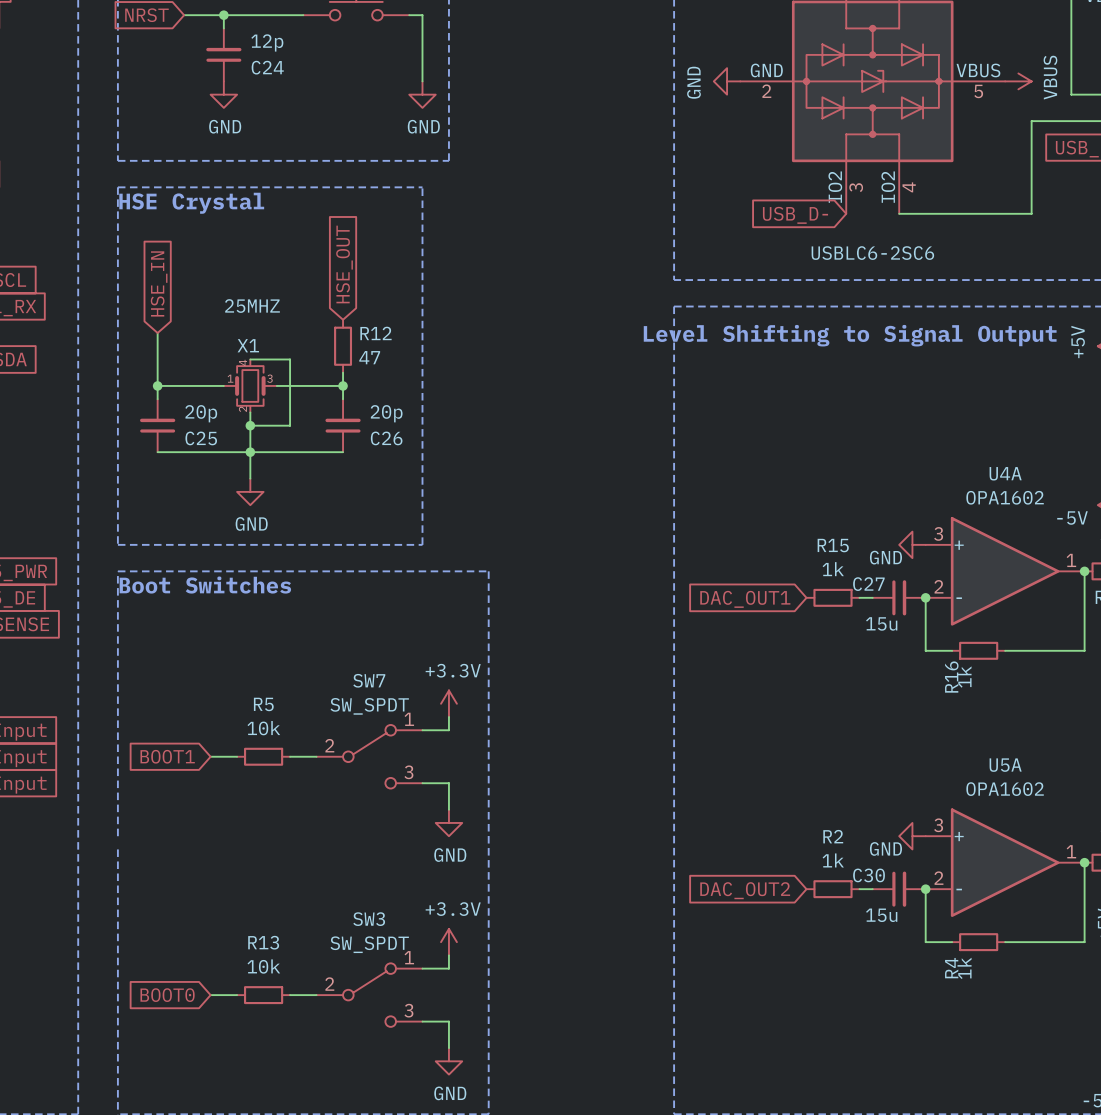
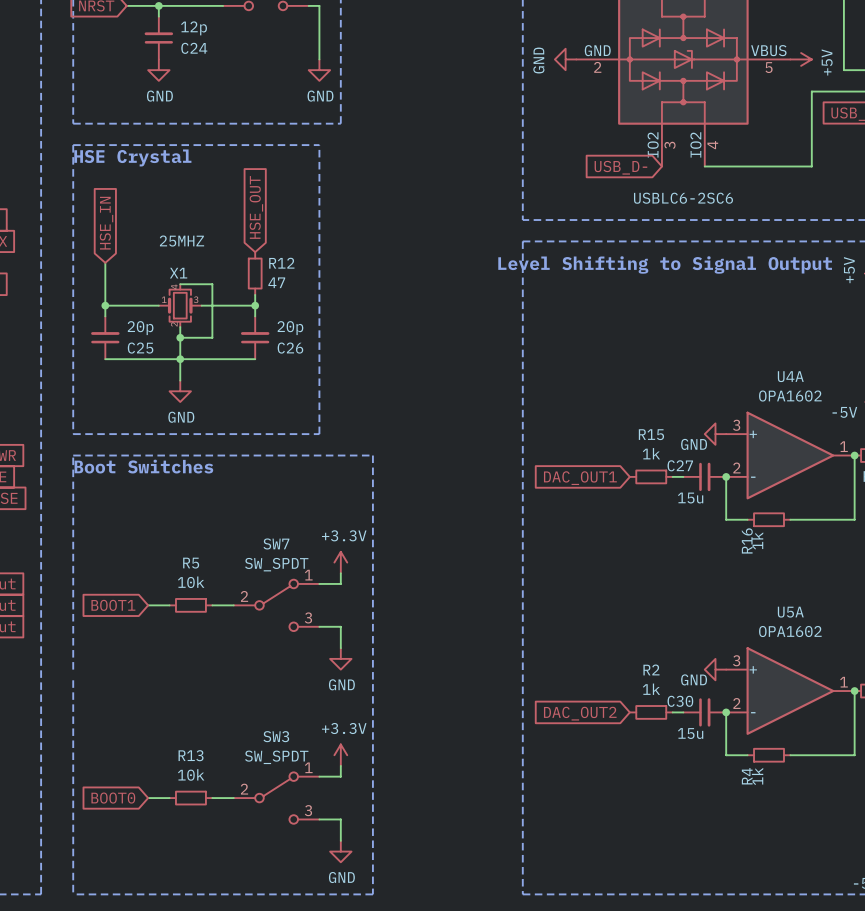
power symbol: VBUS (1018, 81) -> +5V (801, 59)

